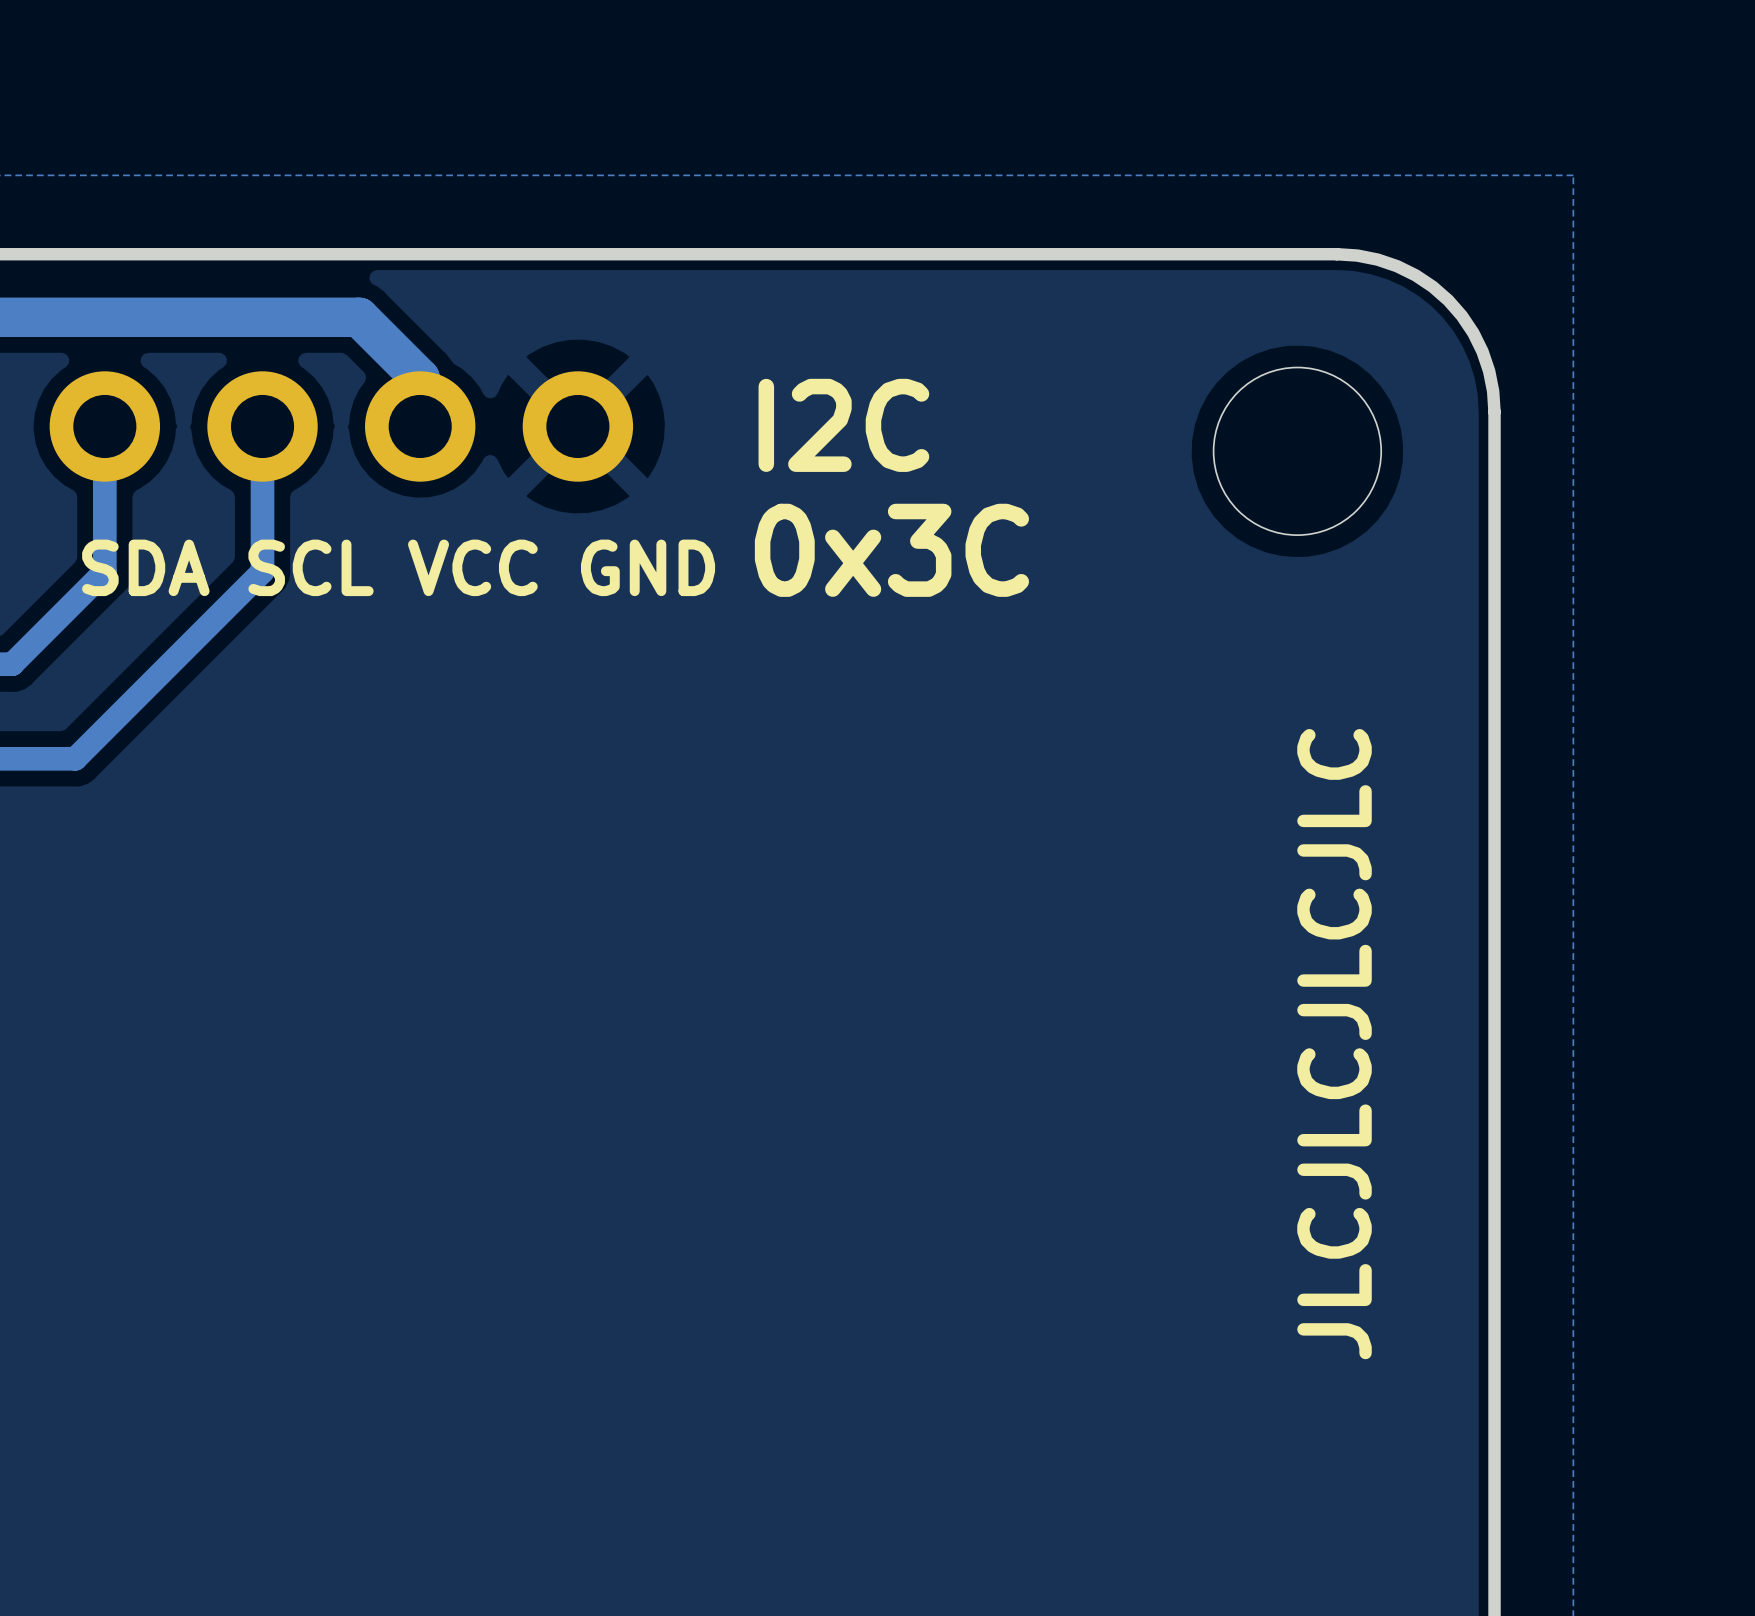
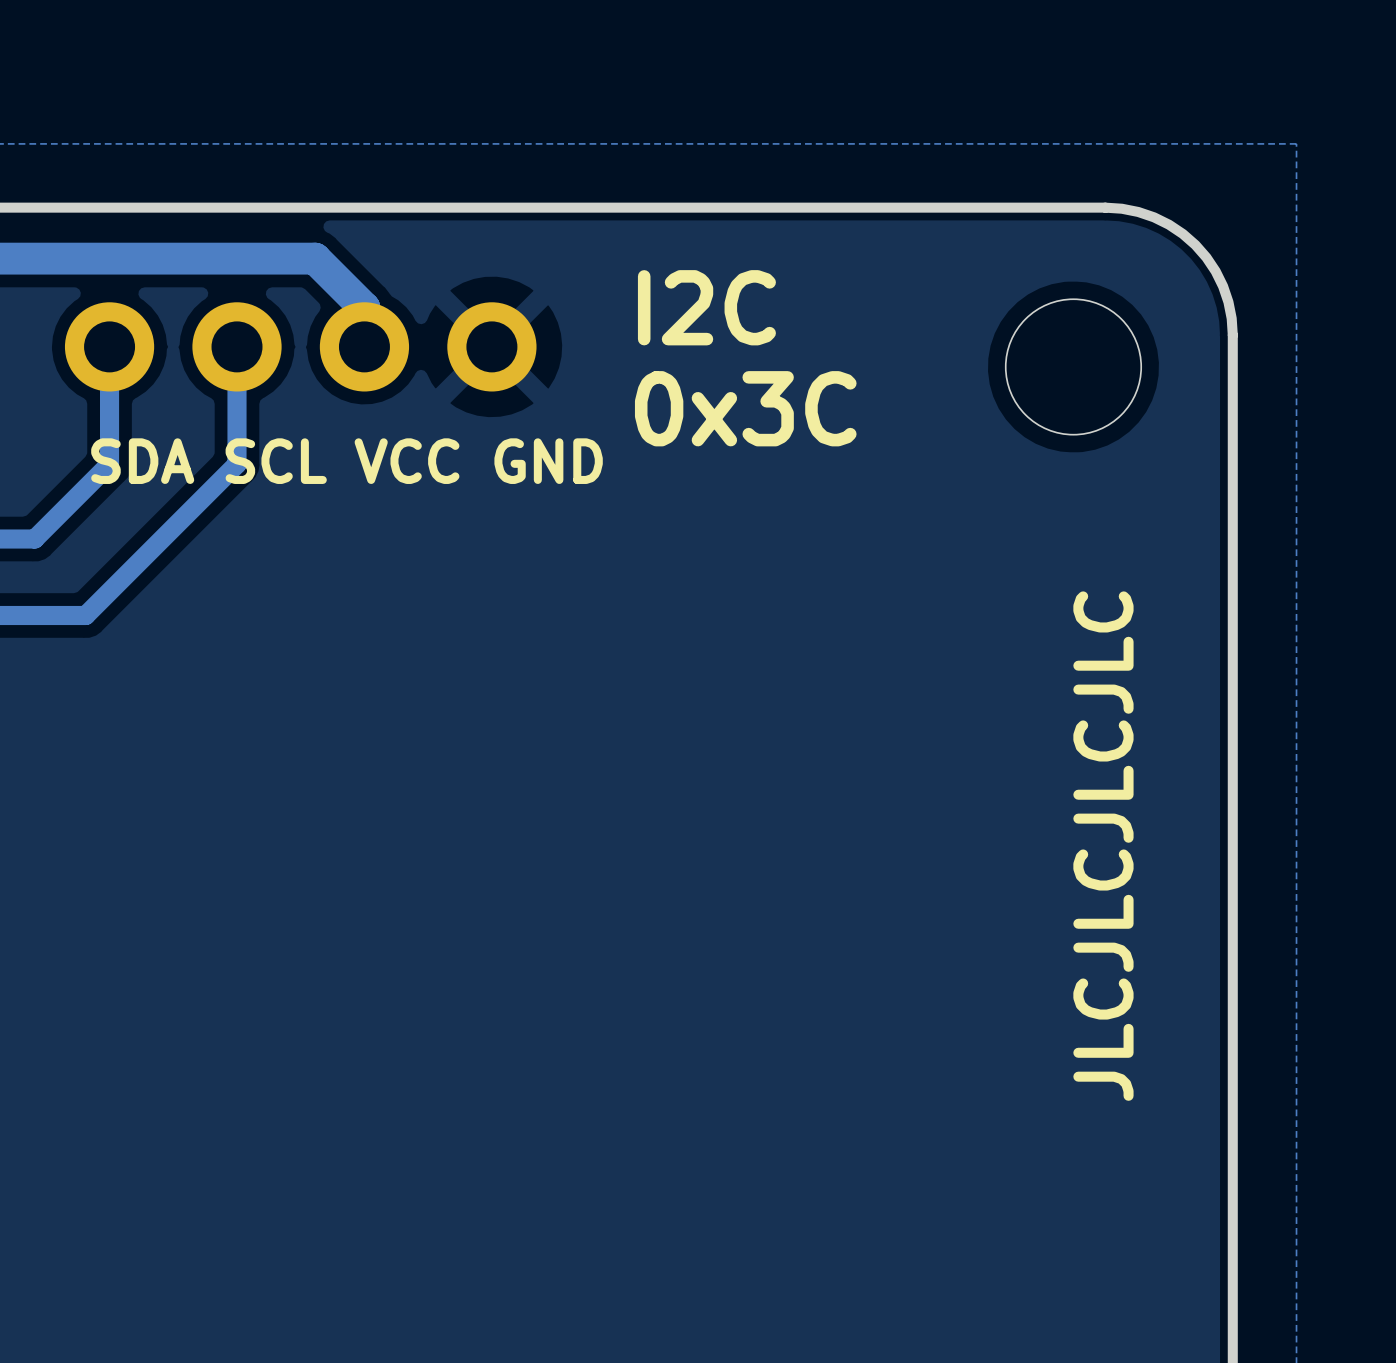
text position: I2C (843, 425) -> I2C (706, 307)
text position: 0x3C (891, 550) -> 0x3C (745, 408)

